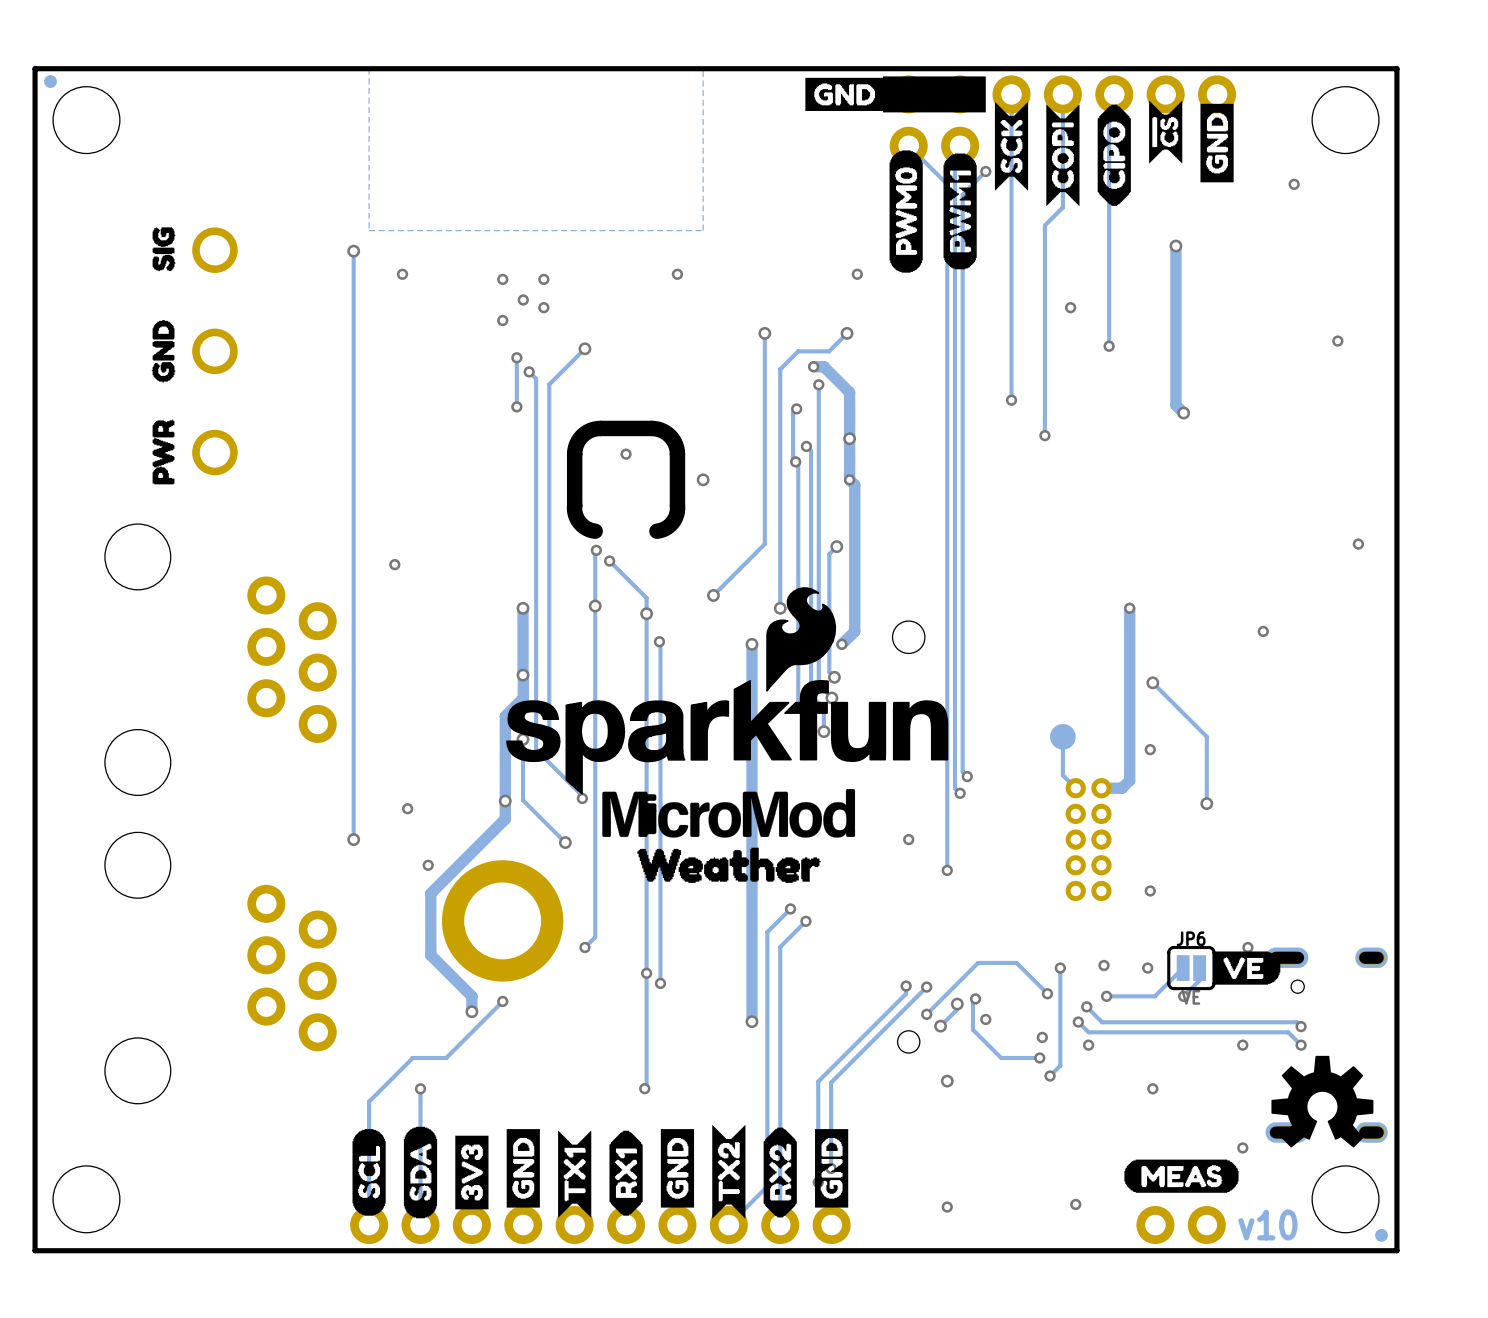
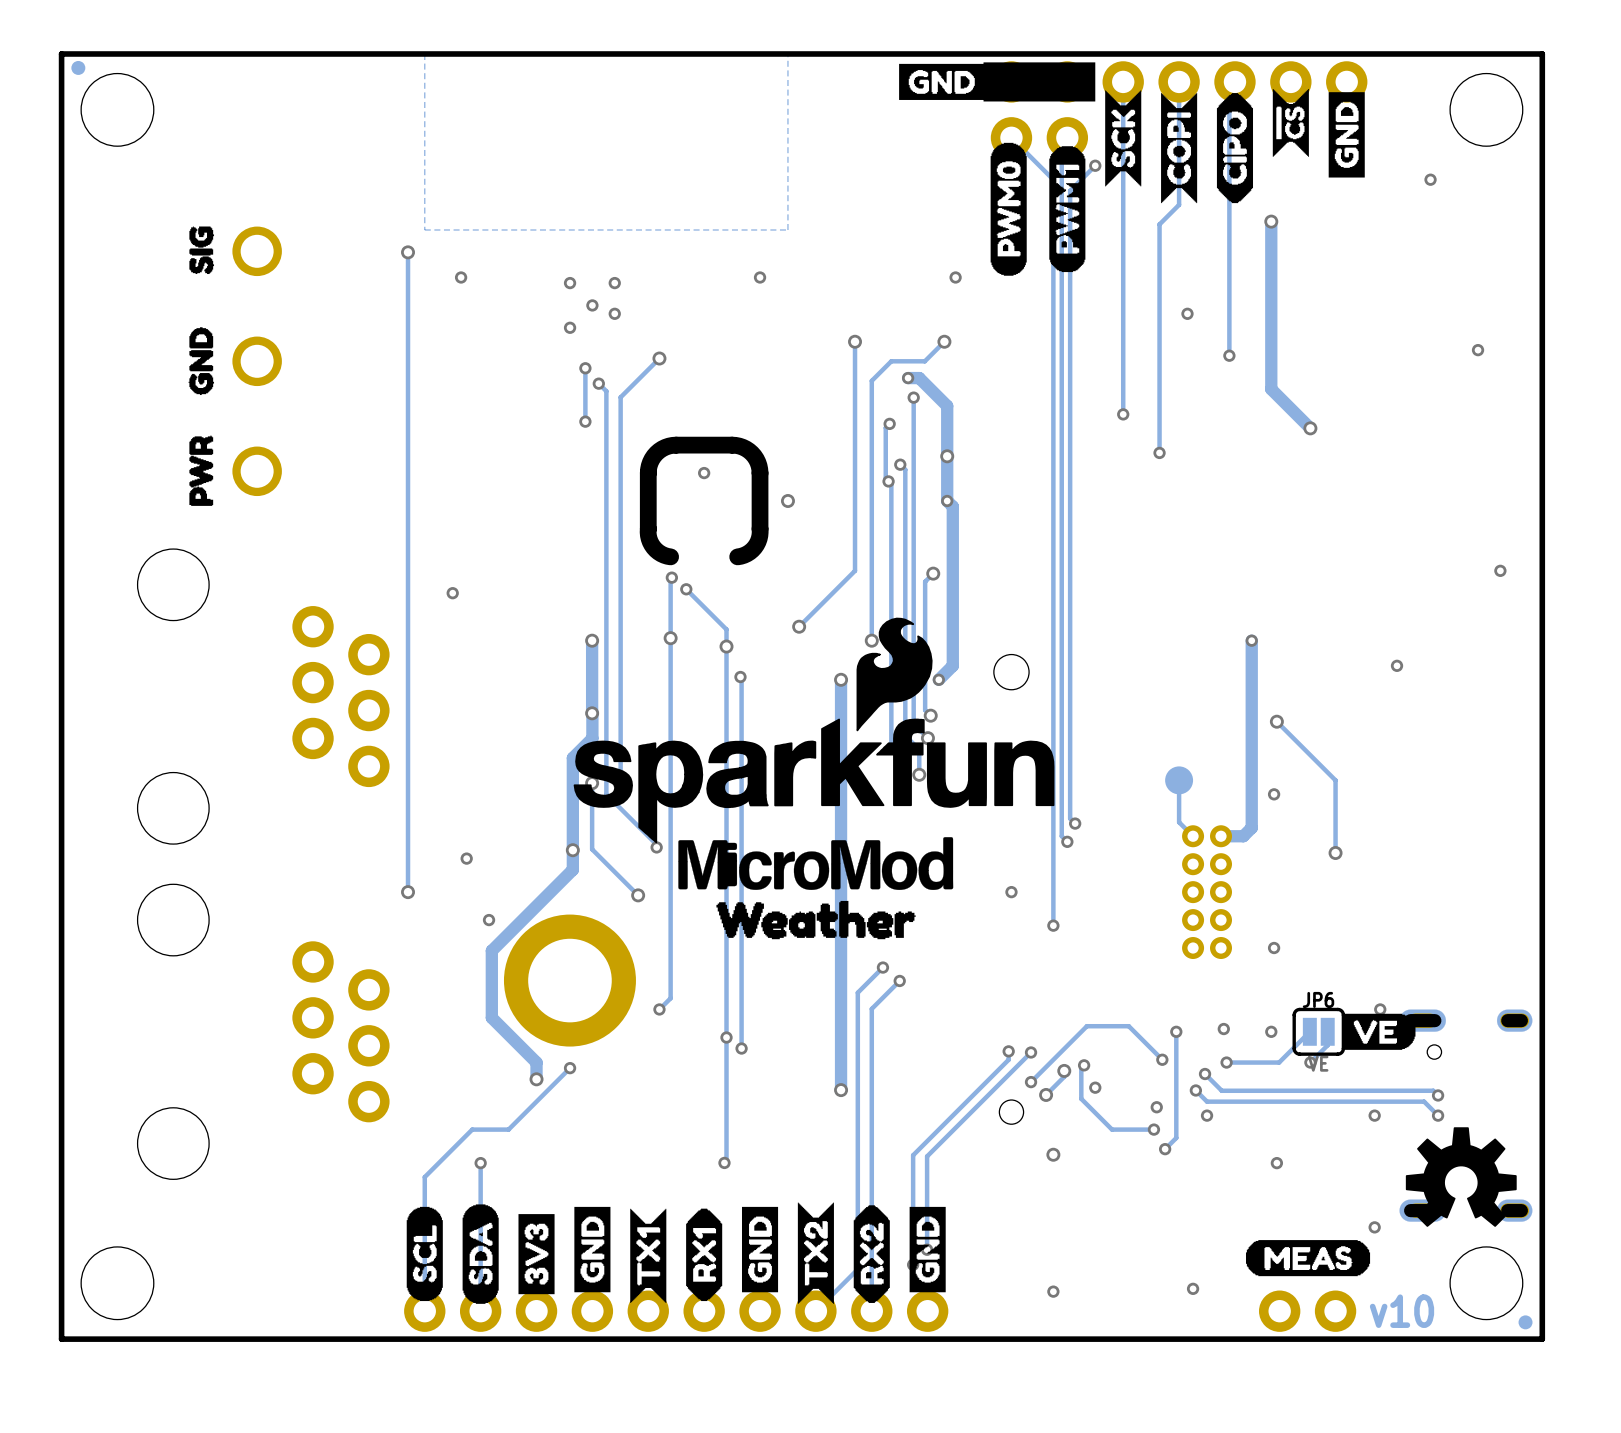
track: (1175, 246) (1175, 405) -> (1271, 221) (1271, 389) (1302, 419)
via position: (1175, 246) -> (1271, 221)

